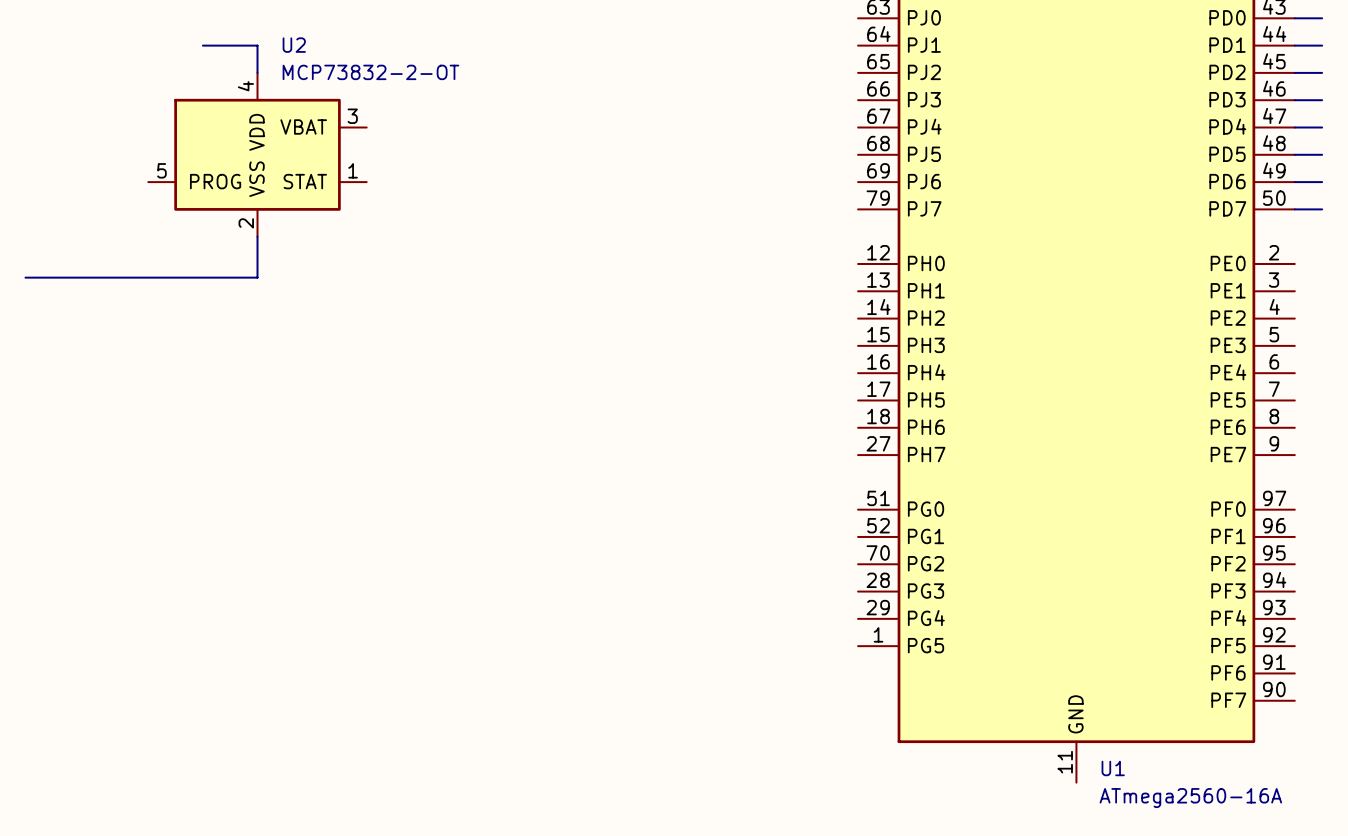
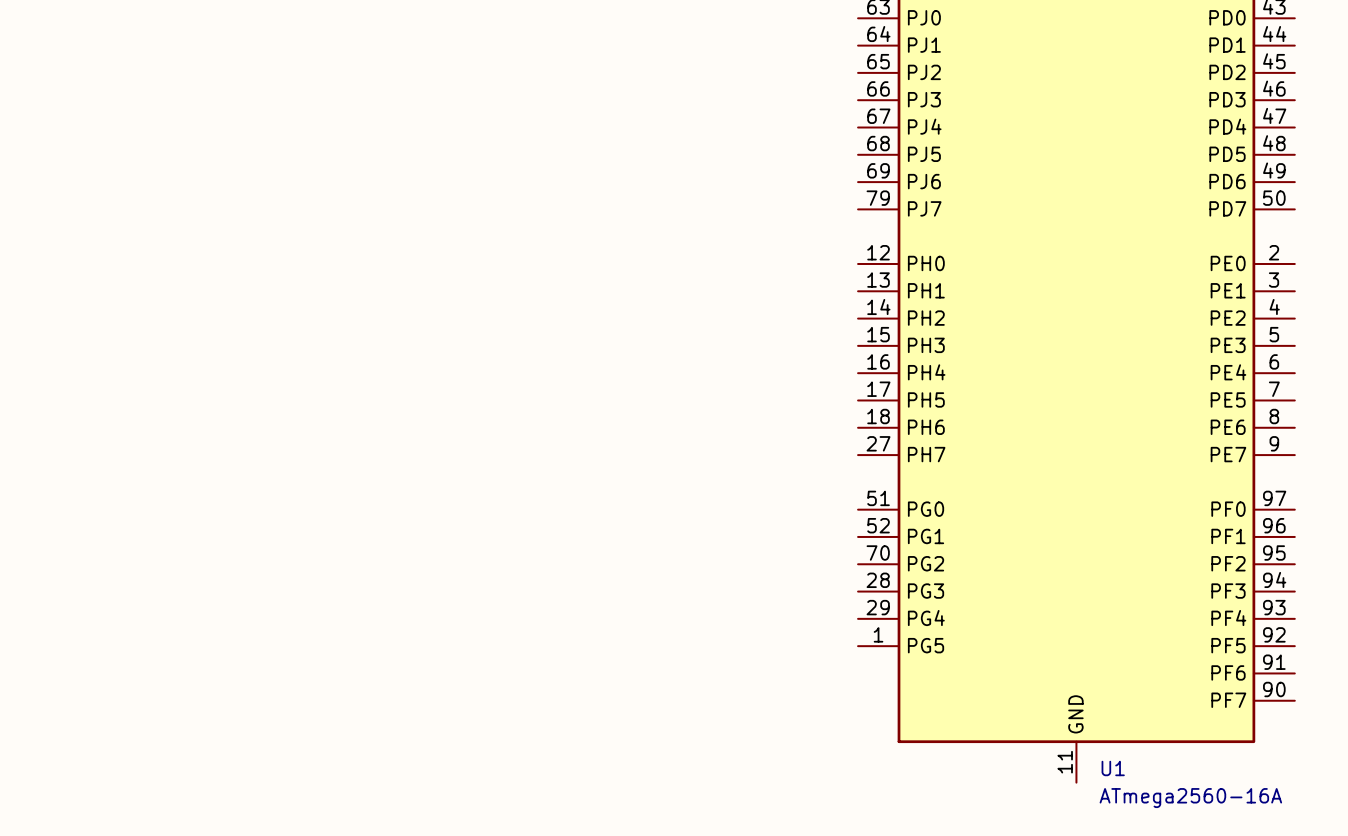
wire: (1294, 18) (1322, 18) -> none
wire: (202, 45) (257, 45) (257, 72) -> none
wire: (1294, 45) (1322, 45) -> none
wire: (1294, 72) (1322, 72) -> none
wire: (1294, 100) (1322, 100) -> none
wire: (1294, 127) (1322, 127) -> none
U2: MCP73832-2-OT (257, 154) -> none
wire: (1294, 154) (1322, 154) -> none
wire: (1294, 182) (1322, 182) -> none
wire: (1294, 209) (1322, 209) -> none
wire: (257, 236) (257, 277) (25, 277) -> none

